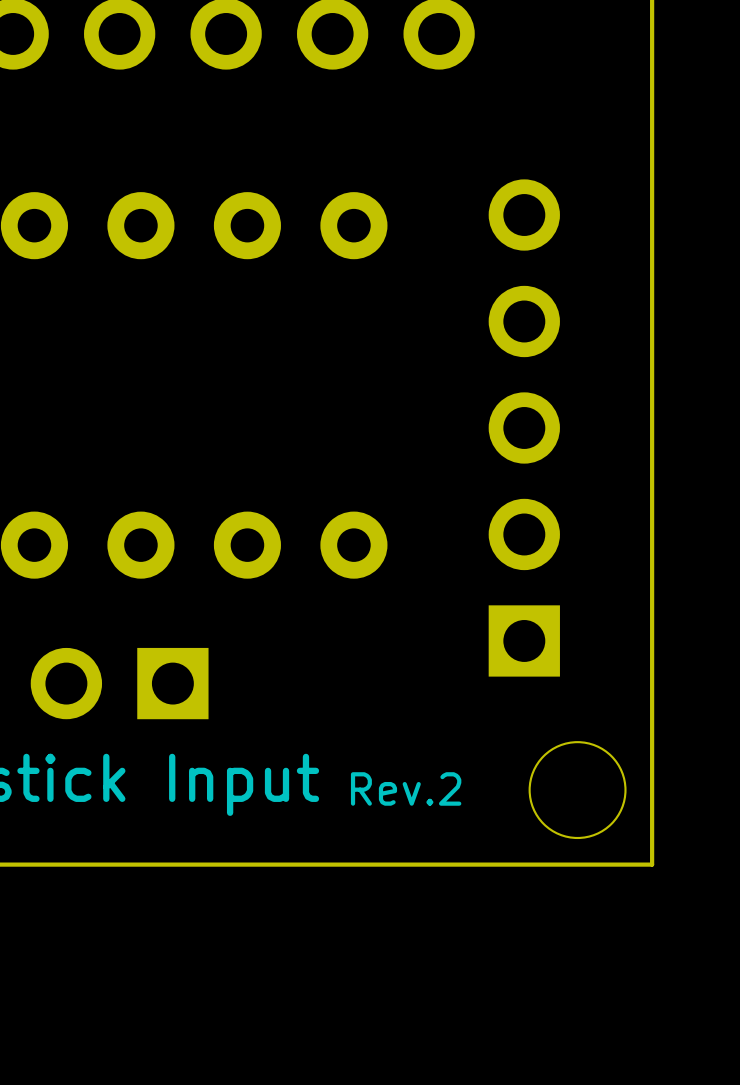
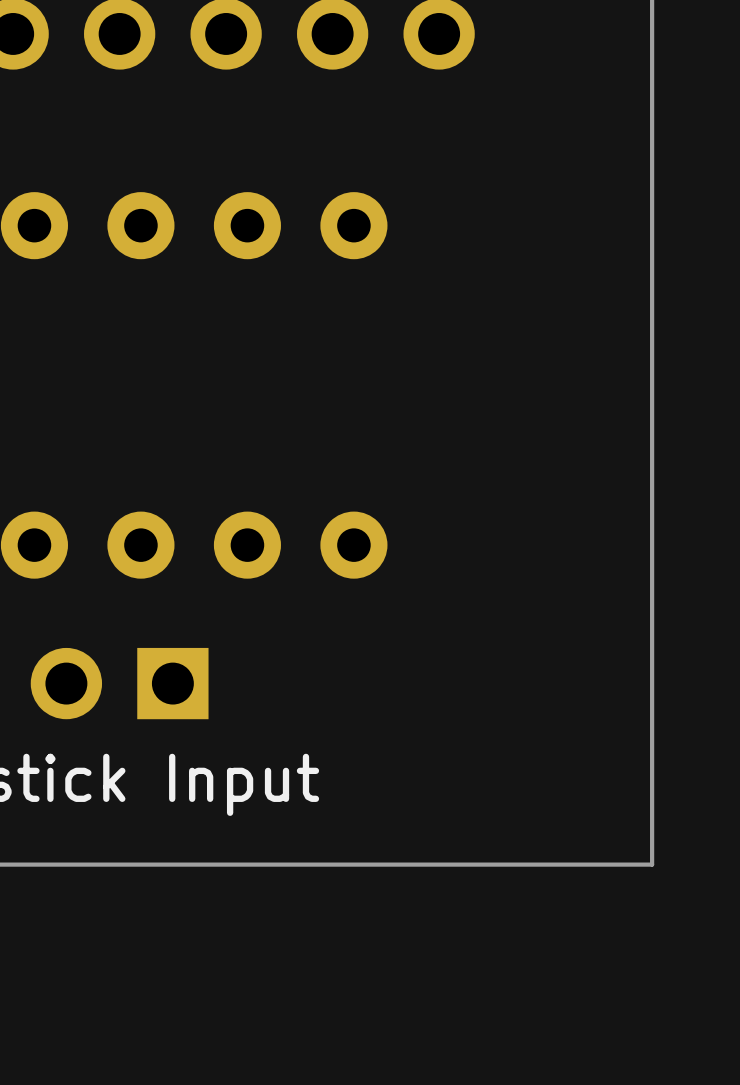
part: (524, 427) -> none
round board edge: [528, 741, 627, 840] -> none
text: Rev.2 (406, 788) -> none

